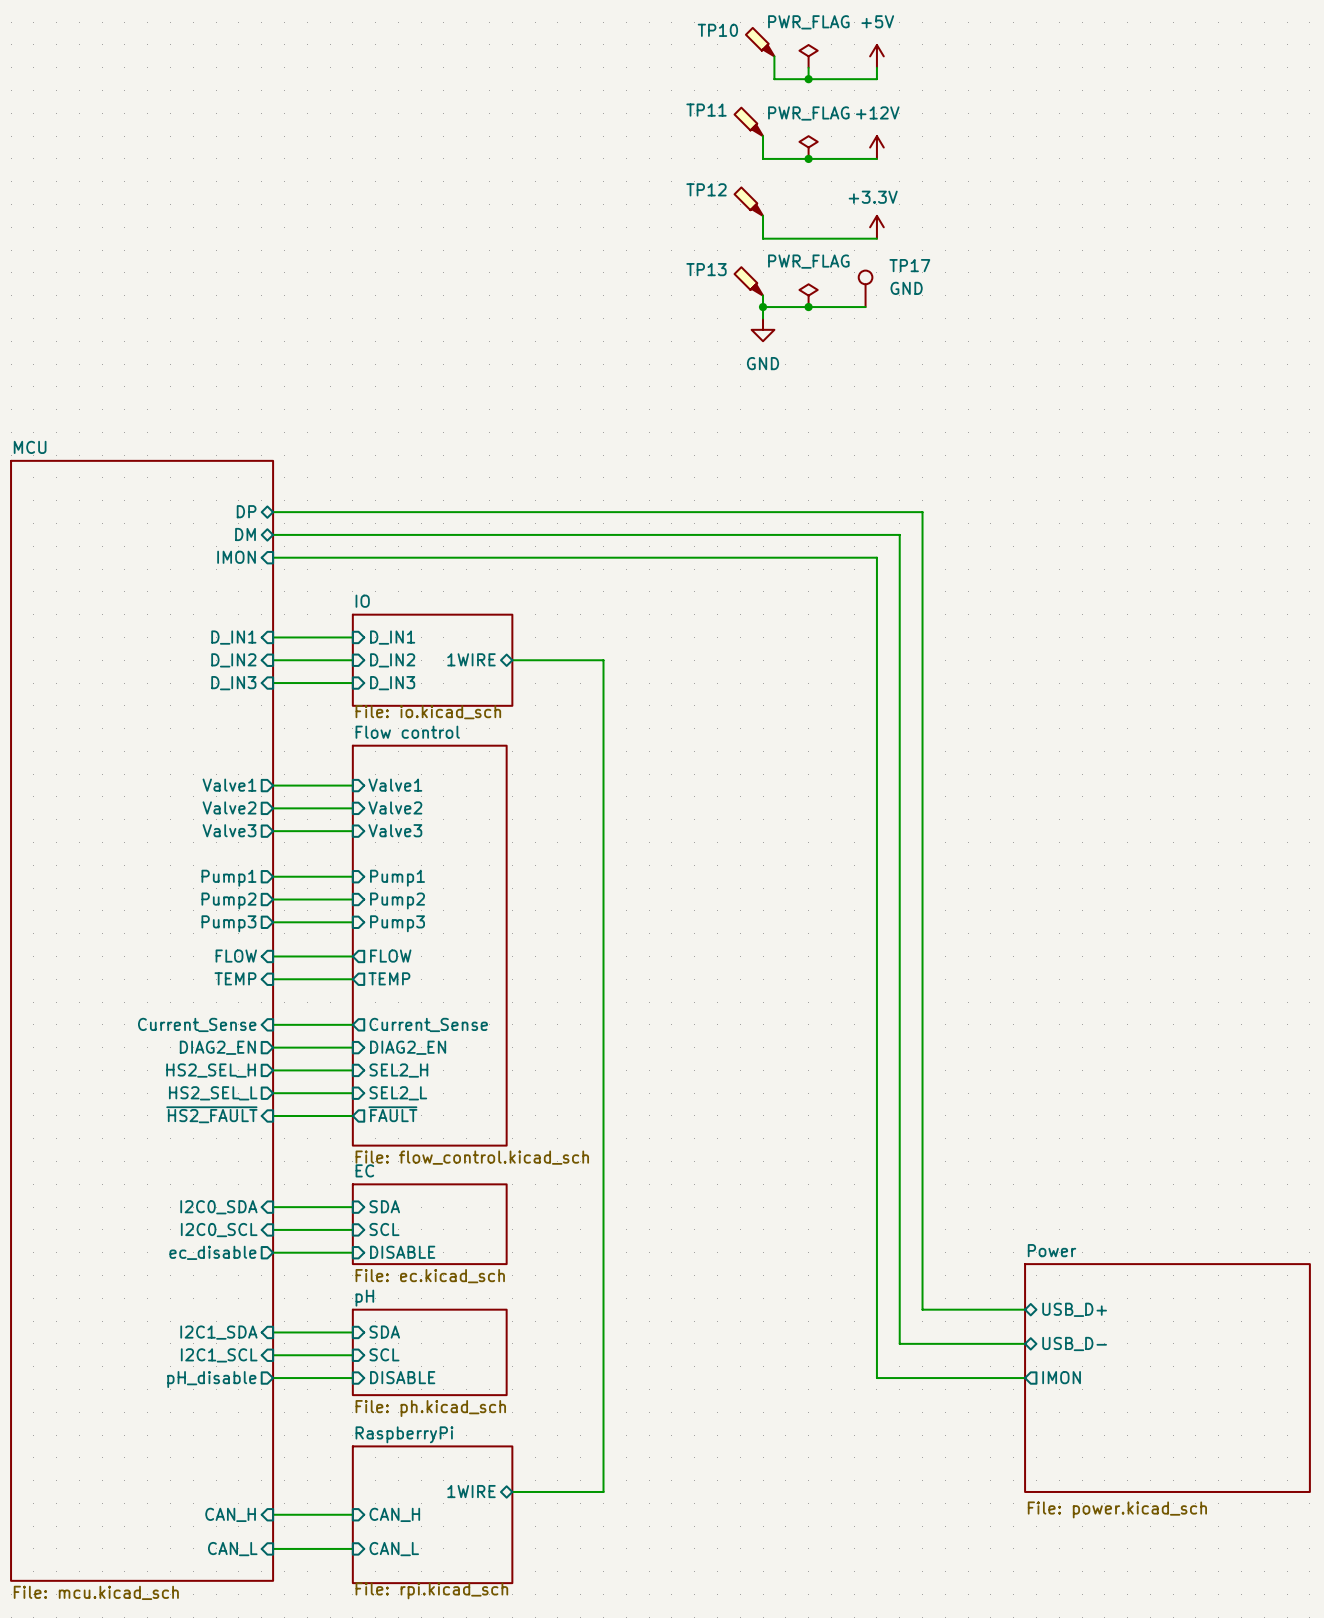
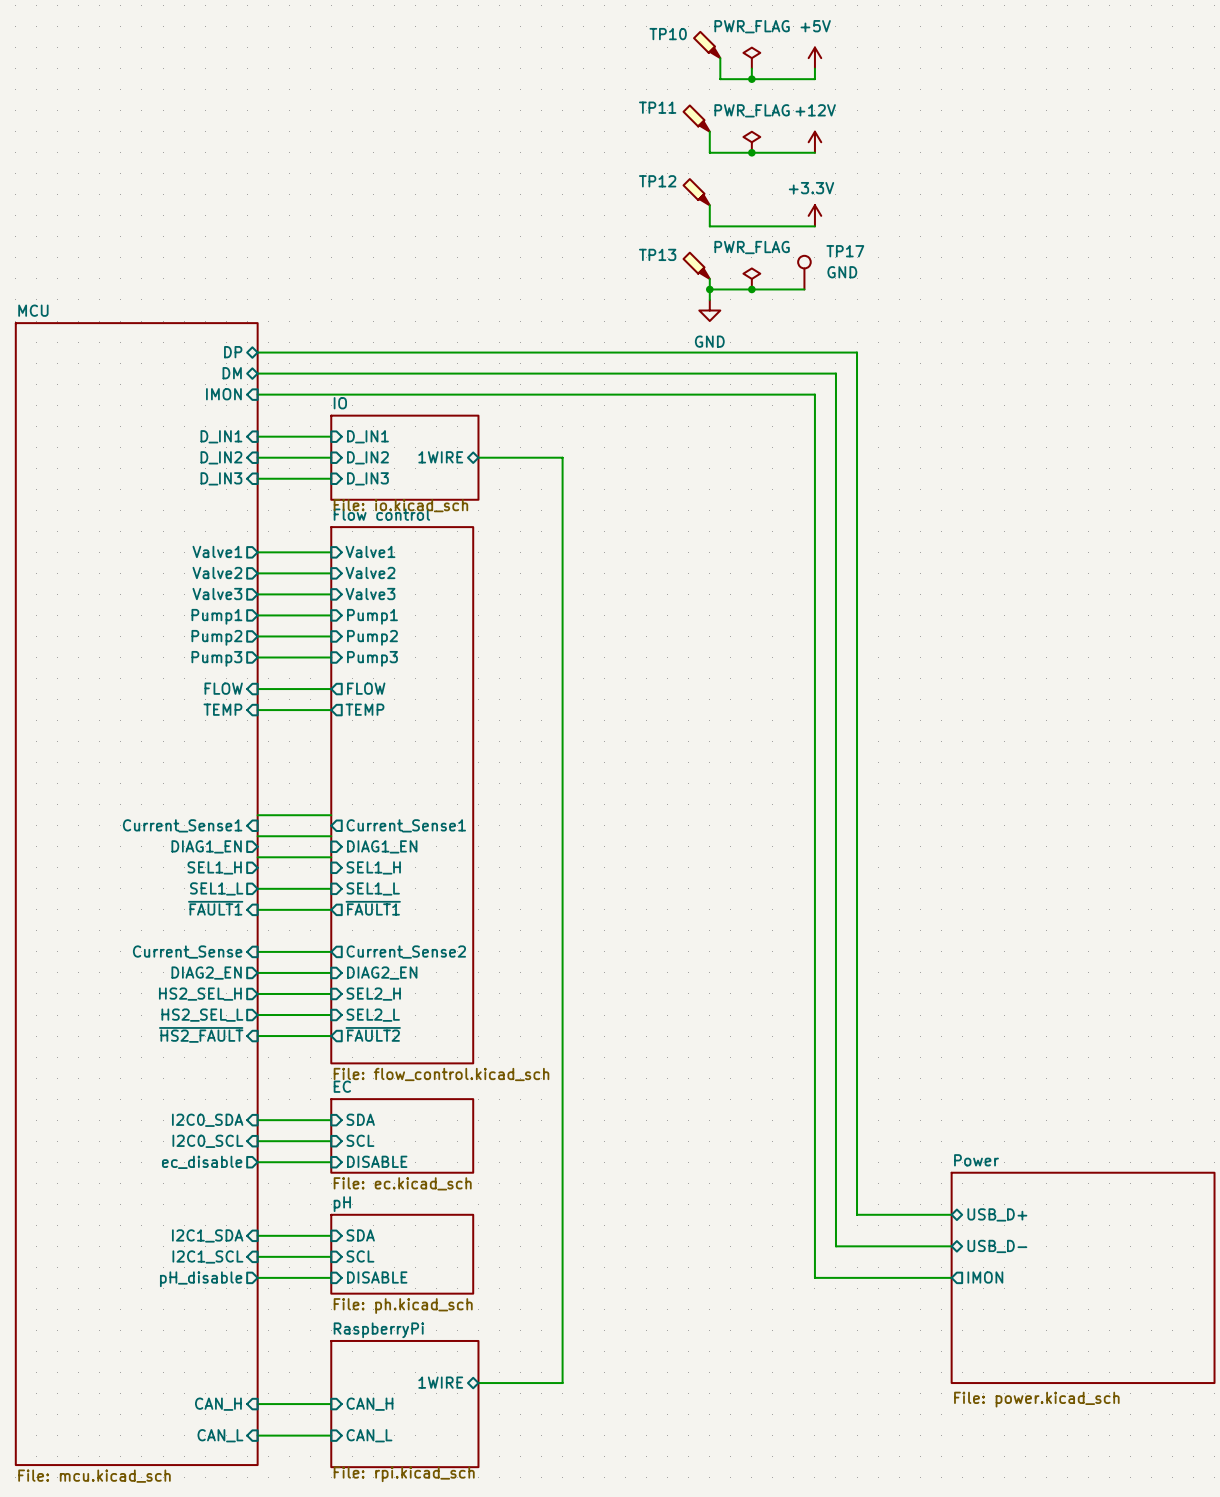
sheet pin: none -> DP (233, 352)
sheet pin: none -> D_IN1 (221, 436)
wire: none -> (257, 436) (331, 436)
sheet pin: none -> D_IN1 (367, 436)
sheet pin: none -> D_IN2 (221, 457)
wire: none -> (257, 457) (331, 457)
sheet pin: none -> D_IN2 (367, 457)
sheet pin shape: bidirectional (246, 511) -> input (221, 478)
sheet pin: DP (246, 511) -> D_IN3 (221, 478)
wire: (352, 512) (922, 512) -> (257, 352) (857, 352) (857, 478)
sheet pin: none -> D_IN3 (367, 478)
sheet pin position: DM (245, 534) -> DM (232, 373)
wire: (273, 534) (899, 534) -> (257, 373) (835, 373) (835, 499)
sheet pin position: IMON (236, 557) -> IMON (223, 394)
wire: (273, 557) (876, 557) -> (257, 394) (814, 394) (814, 520)
sheet pin: none -> Valve1 (217, 551)
wire: none -> (257, 552) (331, 552)
sheet pin: none -> Valve1 (370, 551)
sheet pin: none -> Valve2 (217, 572)
sheet pin: none -> Valve2 (370, 572)
sheet pin shape: input (233, 637) -> output (217, 594)
sheet pin: D_IN1 (233, 637) -> Valve3 (217, 594)
sheet pin: D_IN1 (392, 637) -> Valve3 (370, 594)
sheet pin position: 1WIRE (471, 659) -> 1WIRE (440, 457)
sheet pin shape: input (233, 660) -> output (216, 616)
sheet pin: D_IN2 (233, 660) -> Pump1 (216, 616)
sheet pin: D_IN2 (392, 660) -> Pump1 (372, 616)
sheet IO position: (432, 660) -> (404, 457)
wire: (512, 660) (603, 660) -> (478, 457) (562, 457) (562, 615)
sheet pin shape: input (233, 683) -> output (216, 637)
sheet pin: D_IN3 (233, 683) -> Pump2 (216, 637)
sheet pin: D_IN3 (392, 683) -> Pump2 (372, 637)
wire: none -> (257, 657) (331, 657)
sheet pin: none -> Pump3 (216, 658)
sheet pin: none -> Pump3 (372, 658)
sheet pin: none -> FLOW (223, 688)
sheet pin: none -> FLOW (366, 688)
sheet pin: none -> TEMP (222, 709)
sheet pin: none -> TEMP (364, 709)
sheet pin: Valve1 (229, 785) -> none
wire: (273, 785) (352, 785) -> (257, 689) (331, 689)
sheet pin: Valve1 (395, 785) -> none
sheet pin: Valve2 (229, 807) -> none
sheet pin: Valve2 (395, 807) -> none
wire: (273, 808) (352, 808) -> (257, 710) (331, 710)
sheet pin: Valve3 (229, 830) -> none
sheet pin: Valve3 (395, 830) -> none
wire: (273, 831) (352, 831) -> (257, 573) (331, 573)
sheet Flow control: none -> File: flow_control.kicad_sch (402, 795)
sheet pin: Pump1 (228, 878) -> none
sheet pin: Pump1 (397, 878) -> none
sheet pin: none -> Current_Sense1 (182, 825)
sheet pin: none -> Current_Sense1 (406, 825)
sheet pin: Pump2 (228, 900) -> none
sheet pin: Pump2 (397, 900) -> none
sheet pin: none -> DIAG1_EN (206, 846)
sheet pin: none -> DIAG1_EN (382, 846)
sheet pin: Pump3 (228, 923) -> none
sheet pin: Pump3 (397, 923) -> none
sheet pin: none -> SEL1_H (214, 867)
sheet pin: none -> SEL1_H (373, 867)
sheet Flow control: File: flow_control.kicad_sch (429, 945) -> none
sheet pin shape: input (236, 956) -> output (216, 888)
sheet pin: FLOW (236, 956) -> SEL1_L (216, 888)
sheet pin shape: output (390, 956) -> input (373, 888)
sheet pin: FLOW (390, 956) -> SEL1_L (373, 888)
sheet MCU: none -> File: mcu.kicad_sch (136, 894)
sheet pin: TEMP (235, 978) -> ~{FAULT1} (215, 908)
sheet pin: TEMP (389, 978) -> ~{FAULT1} (373, 908)
sheet MCU: File: mcu.kicad_sch (142, 1020) -> none
sheet pin: Current_Sense (428, 1024) -> Current_Sense2 (406, 952)
sheet pin: ~{FAULT} (392, 1114) -> ~{FAULT2} (373, 1034)

